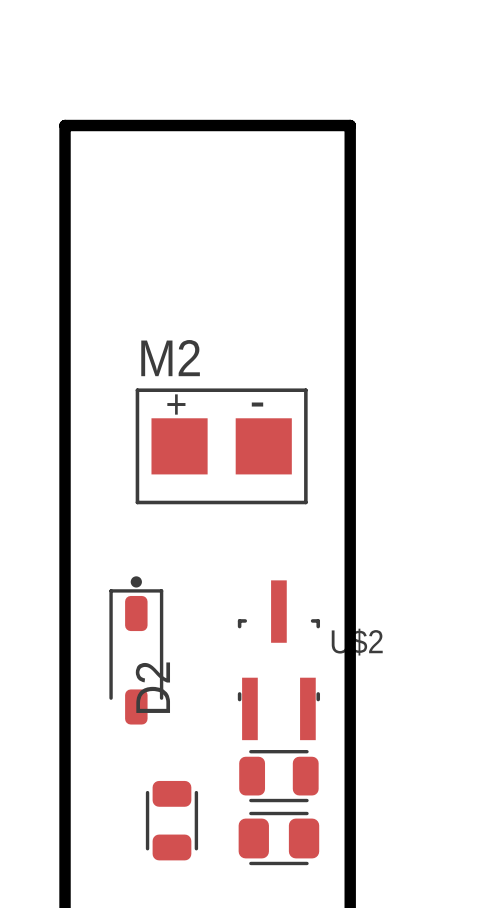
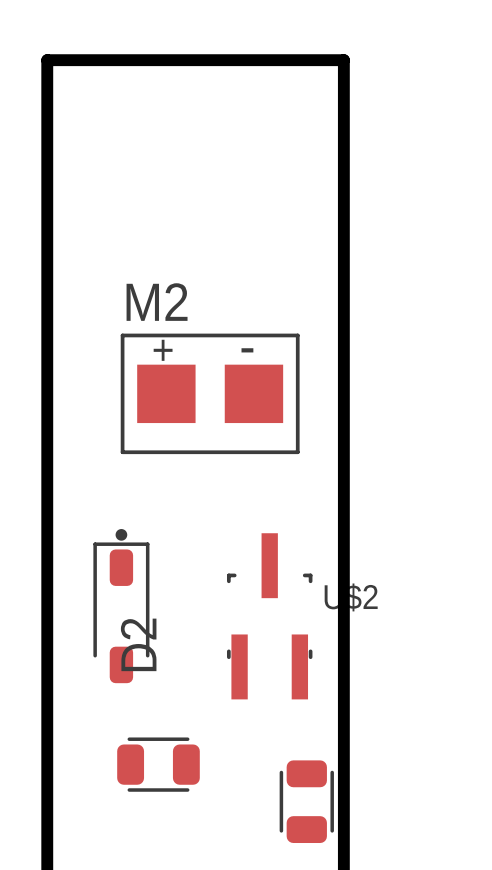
part rotation: 0° (278, 776) -> 90° clockwise (306, 801)
part position: (278, 776) -> (306, 801)
part rotation: 0° (171, 820) -> 90° clockwise (158, 764)
part: (278, 838) -> none

